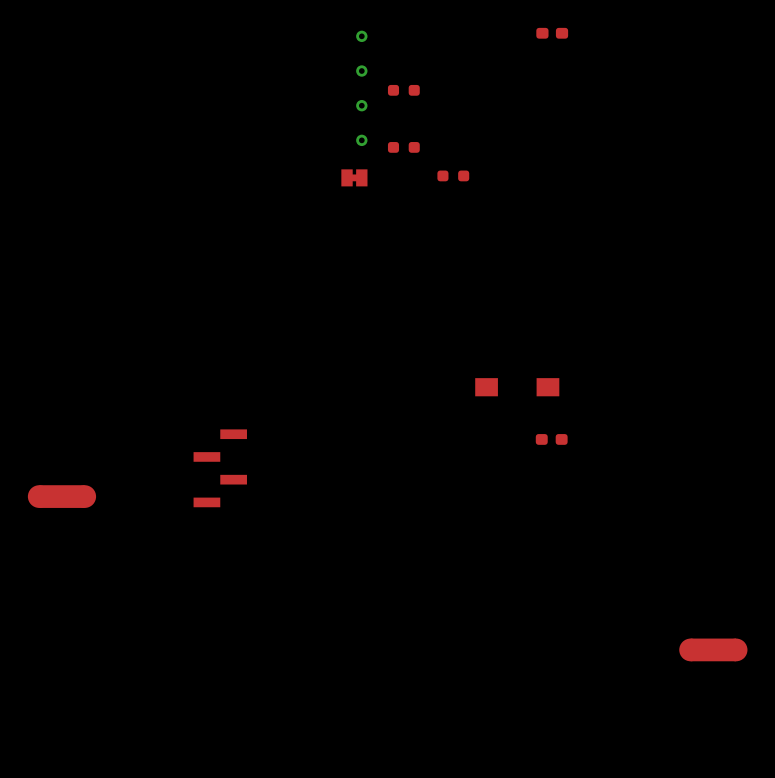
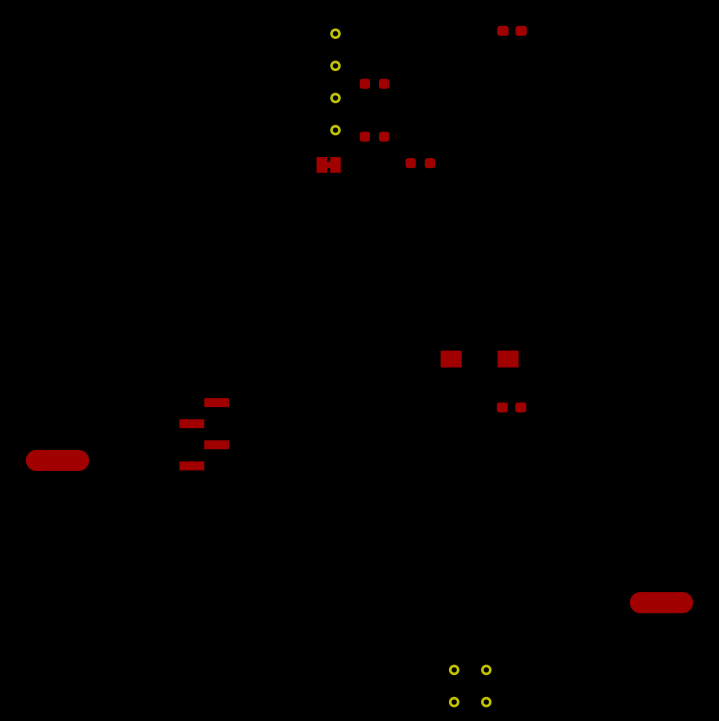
part: none -> (454, 669)
part: none -> (486, 669)
part: none -> (454, 702)
part: none -> (486, 702)

